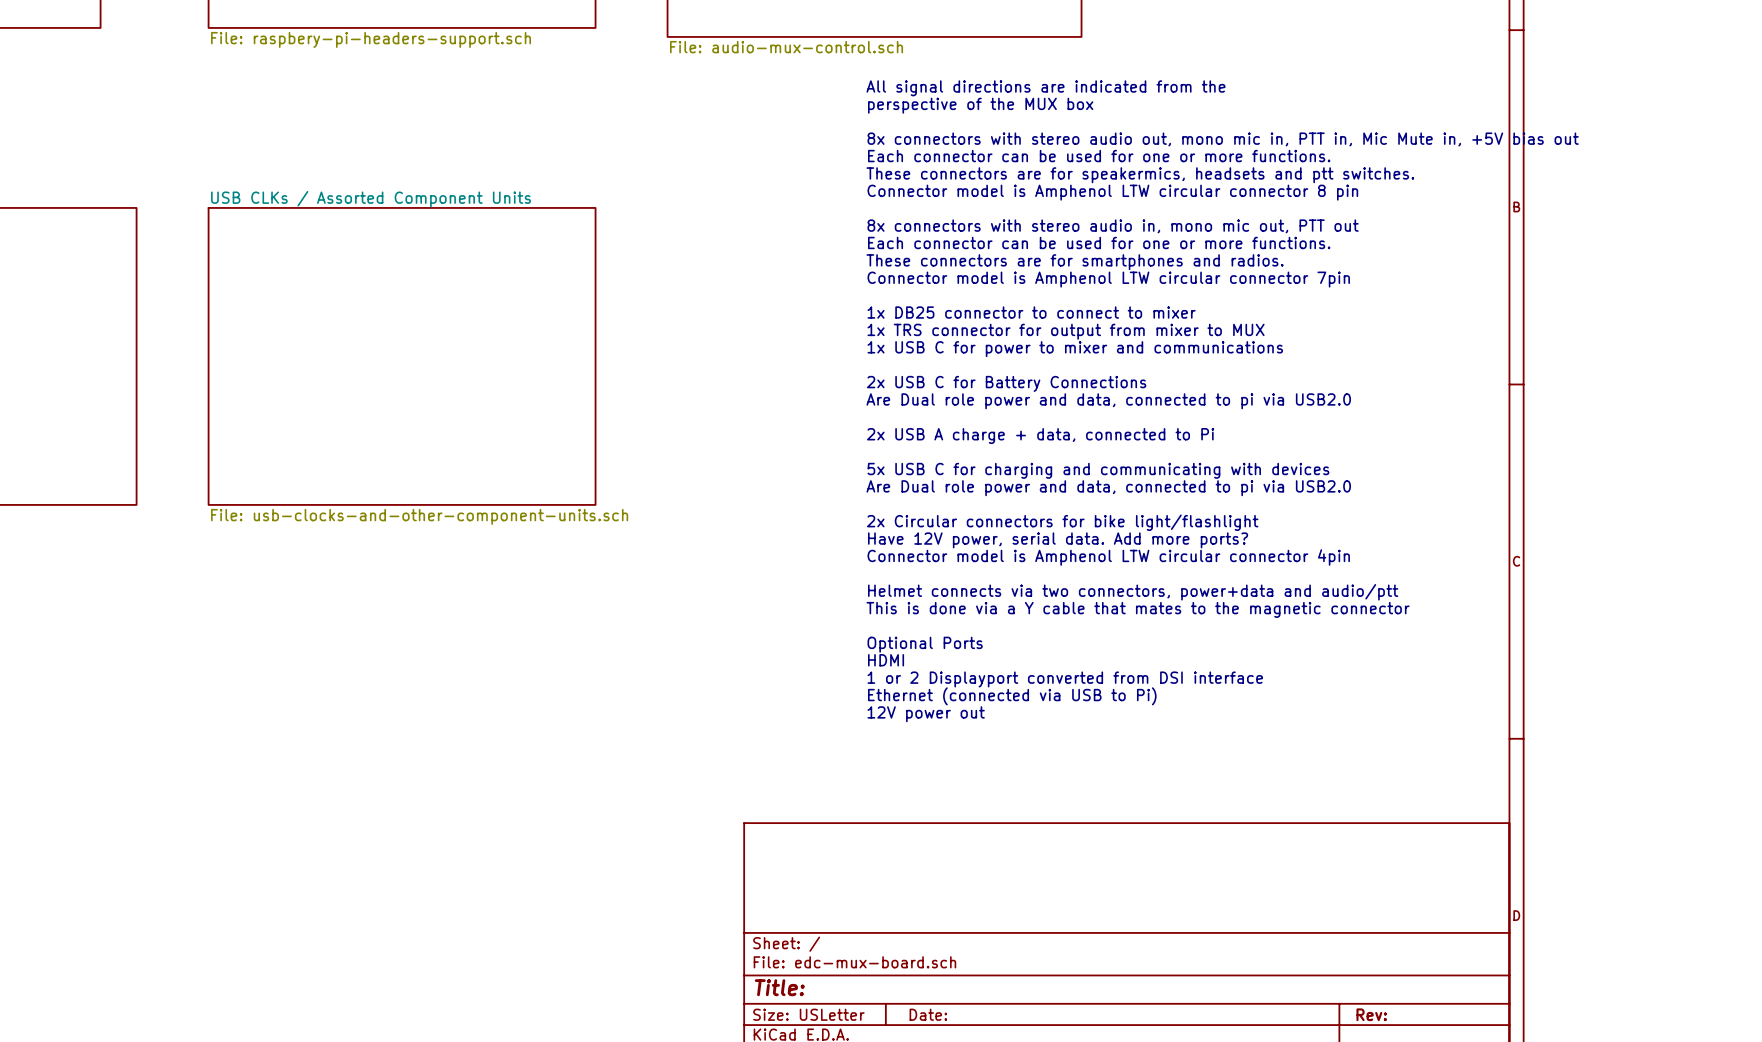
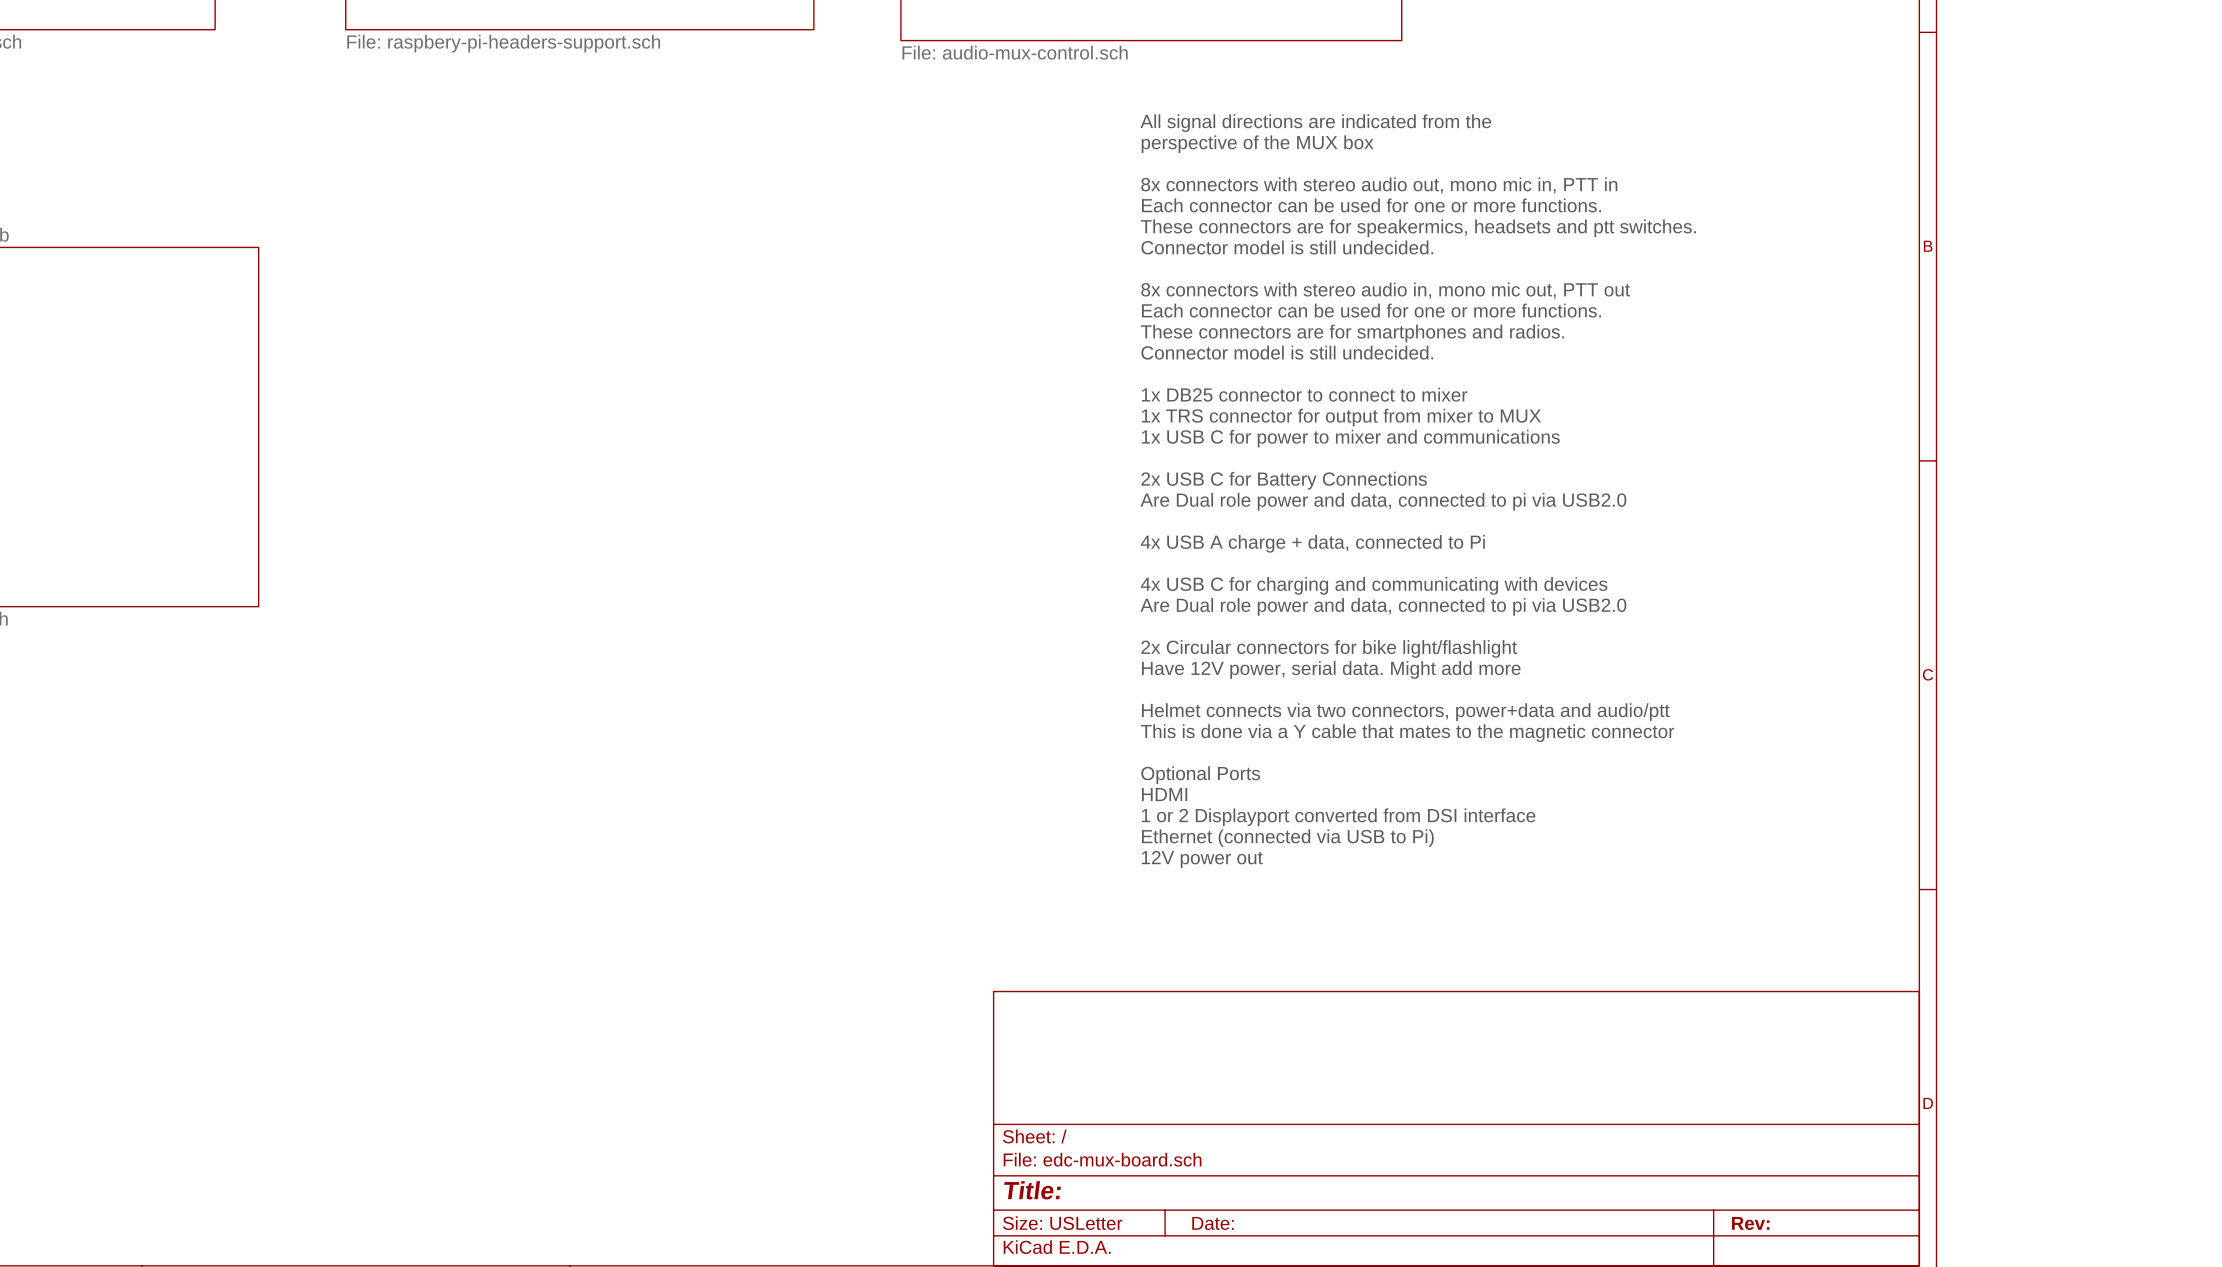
text: All signal directions are indicated from the (1045, 88) -> none
text: perspective of the MUX box (980, 105) -> All signal directions are indicated from the (1315, 123)
text: none -> perspective of the MUX box (1257, 144)
text: 8x connectors with stereo audio out, mono mic in, PTT in, Mic Mute in, +5V bias out (1223, 139) -> none
text: Each connector can be used for one or more functions. (1099, 156) -> 8x connectors with stereo audio out, mono mic in, PTT in (1379, 185)
text: These connectors are for speakermics, headsets and ptt switches. (1140, 175) -> Each connector can be used for one or more functions. (1371, 205)
text: Connector model is Amphenol LTW circular connector 8 pin (1112, 192) -> These connectors are for speakermics, headsets and ptt switches. (1418, 228)
text: none -> Connector model is still undecided. (1287, 247)
text: 8x connectors with stereo audio in, mono mic out, PTT out (1113, 226) -> none
text: Each connector can be used for one or more functions. (1099, 242) -> 8x connectors with stereo audio in, mono mic out, PTT out (1385, 290)
text: These connectors are for smartphones and radios. (1075, 262) -> Each connector can be used for one or more functions. (1371, 310)
text: Connector model is Amphenol LTW circular connector 7pin (1108, 279) -> These connectors are for smartphones and radios. (1352, 333)
text: none -> Connector model is still undecided. (1287, 352)
text: 1x DB25 connector to connect to mixer (1031, 312) -> none
text: 1x TRS connector for output from mixer to MUX (1066, 331) -> 1x DB25 connector to connect to mixer (1304, 394)
text: 1x USB C for power to mixer and communications (1075, 349) -> 1x TRS connector for output from mixer to MUX (1341, 417)
sheet USB CLKs / Assorted Component Units: File: usb-clocks-and-other-component-units.sch (402, 356) -> none
text: 2x USB C for Battery Connections (1006, 383) -> 1x USB C for power to mixer and communications (1350, 438)
text: Are Dual role power and data, connected to pi via USB2.0 (1108, 401) -> 2x USB C for Battery Connections (1284, 480)
text: none -> Are Dual role power and data, connected to pi via USB2.0 (1383, 501)
text: 2x USB A charge + data, connected to Pi (1040, 436) -> 4x USB A charge + data, connected to Pi (1312, 543)
text: 5x USB C for charging and communicating with devices (1098, 470) -> none
text: Are Dual role power and data, connected to pi via USB2.0 (1108, 488) -> 4x USB C for charging and communicating with devices (1374, 585)
text: none -> Are Dual role power and data, connected to pi via USB2.0 (1383, 606)
text: 2x Circular connectors for bike light/flashlight (1062, 522) -> none
text: Have 12V power, serial data. Add more ports? (1058, 540) -> 2x Circular connectors for bike light/flashlight (1329, 648)
text: Connector model is Amphenol LTW circular connector 4pin (1108, 557) -> Have 12V power, serial data. Might add more (1331, 669)

